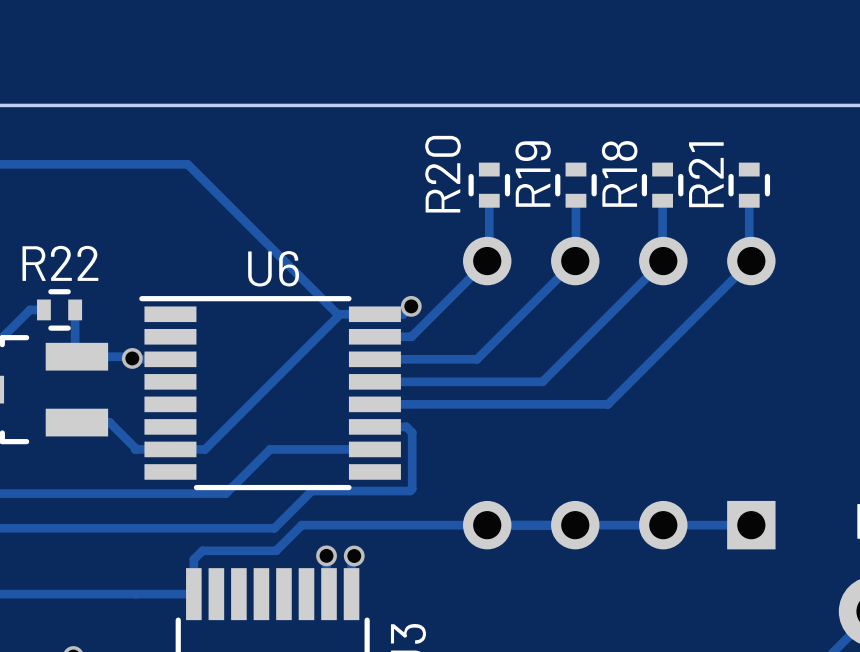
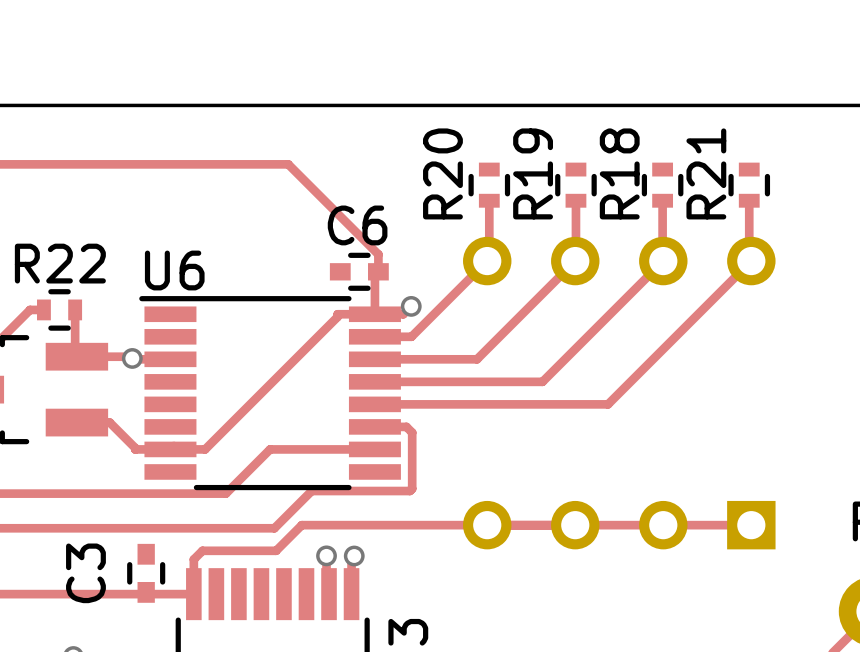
track: (187, 164) (337, 314) -> (187, 164) (288, 164) (378, 254) (378, 271) (374, 275) (374, 314)
U6 name position: U6 (273, 268) -> U6 (174, 270)
C6: none -> (359, 271)
C3: none -> (146, 573)

